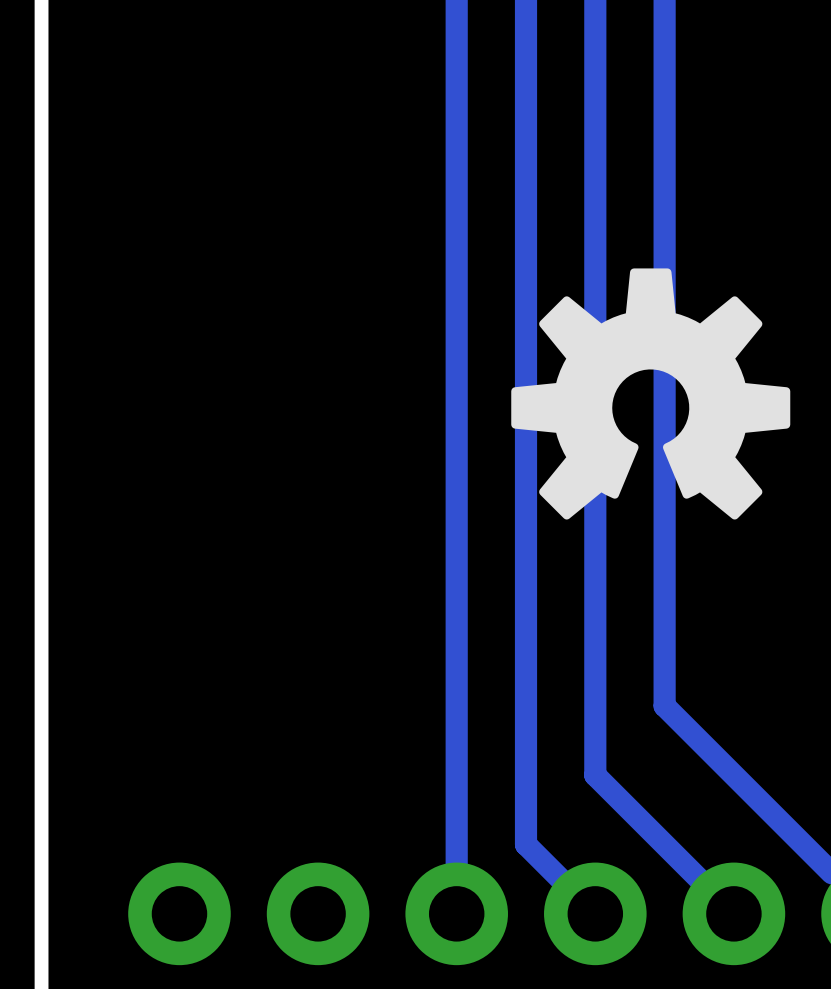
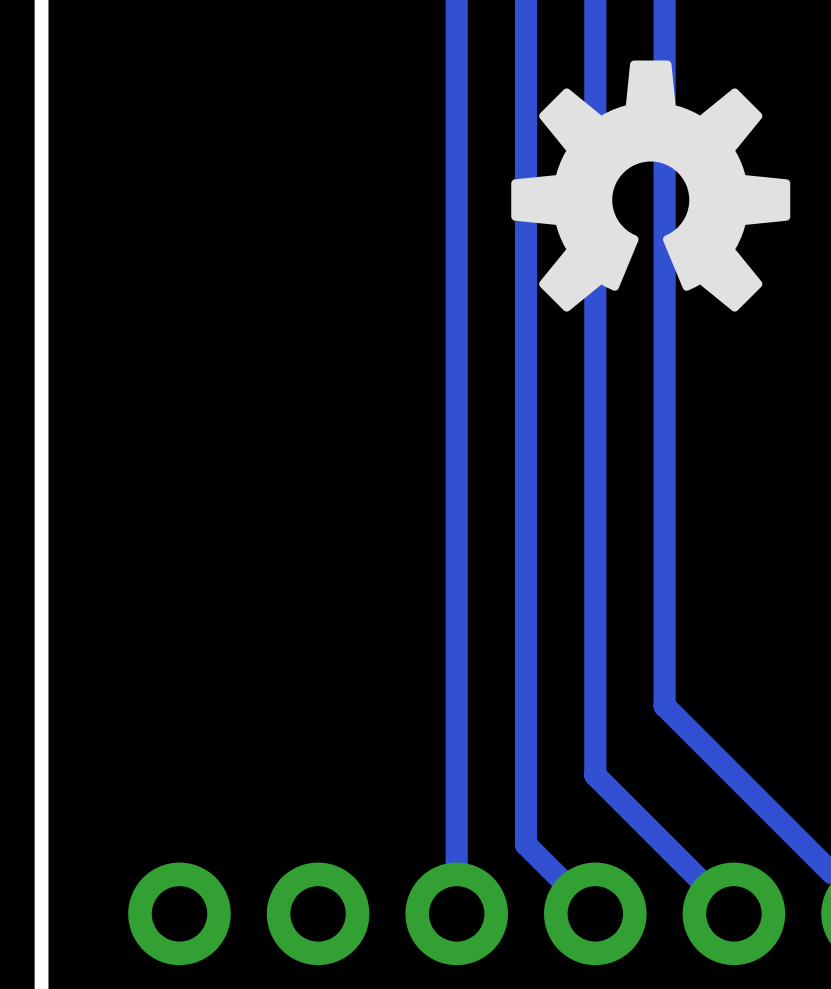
drawing position: (650, 393) -> (650, 186)

